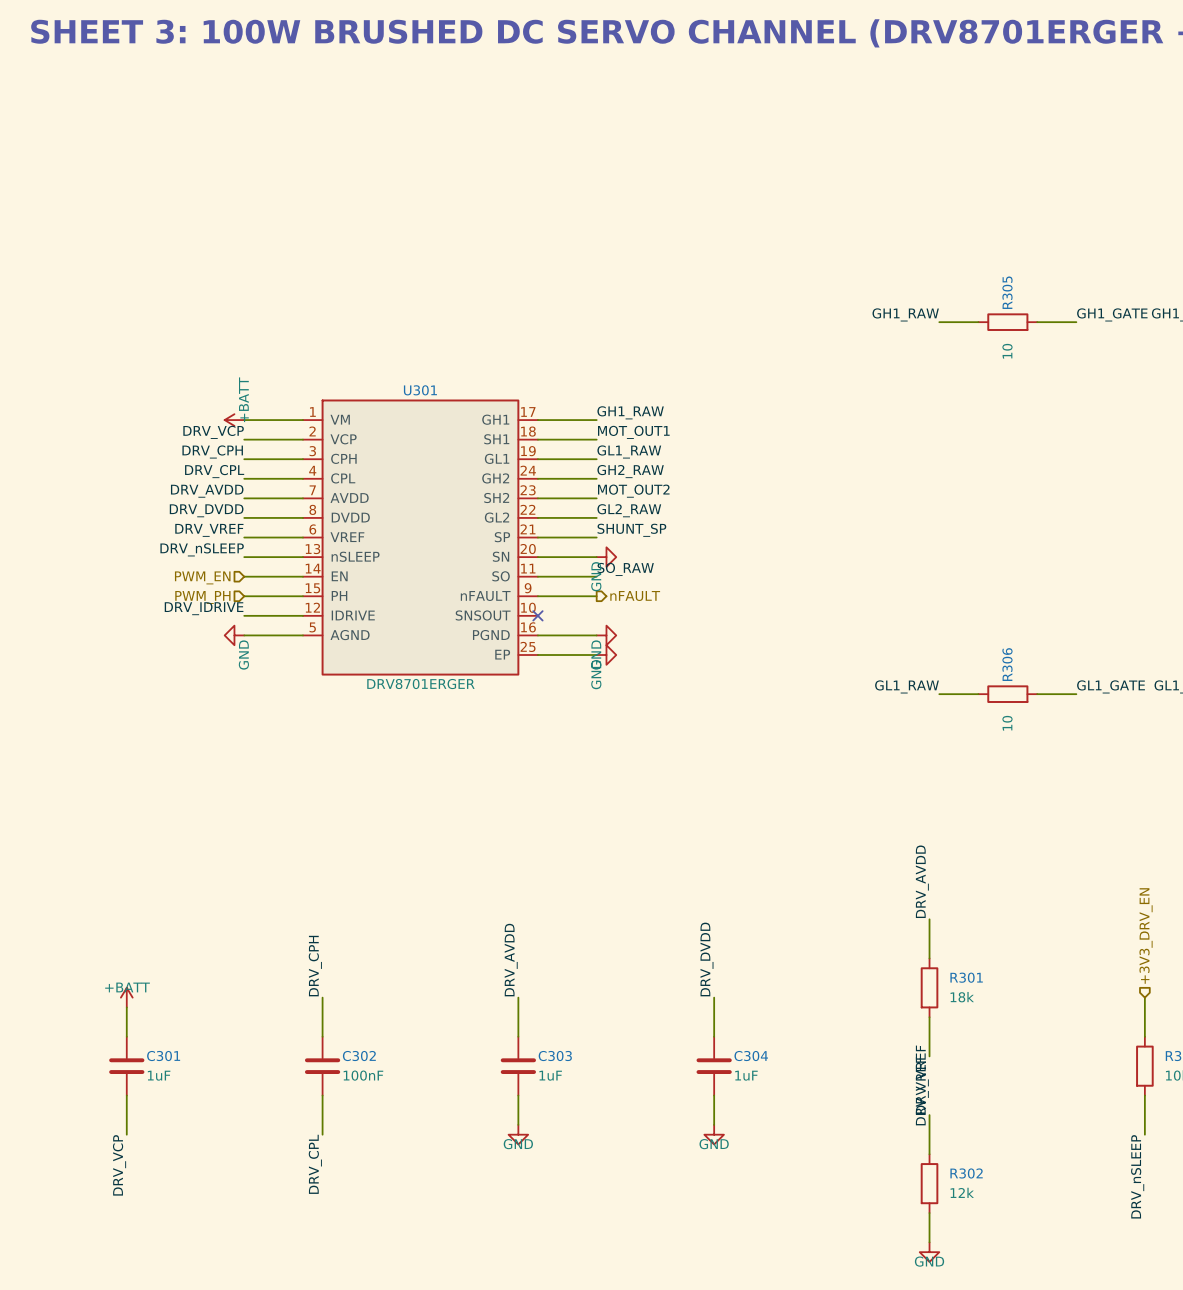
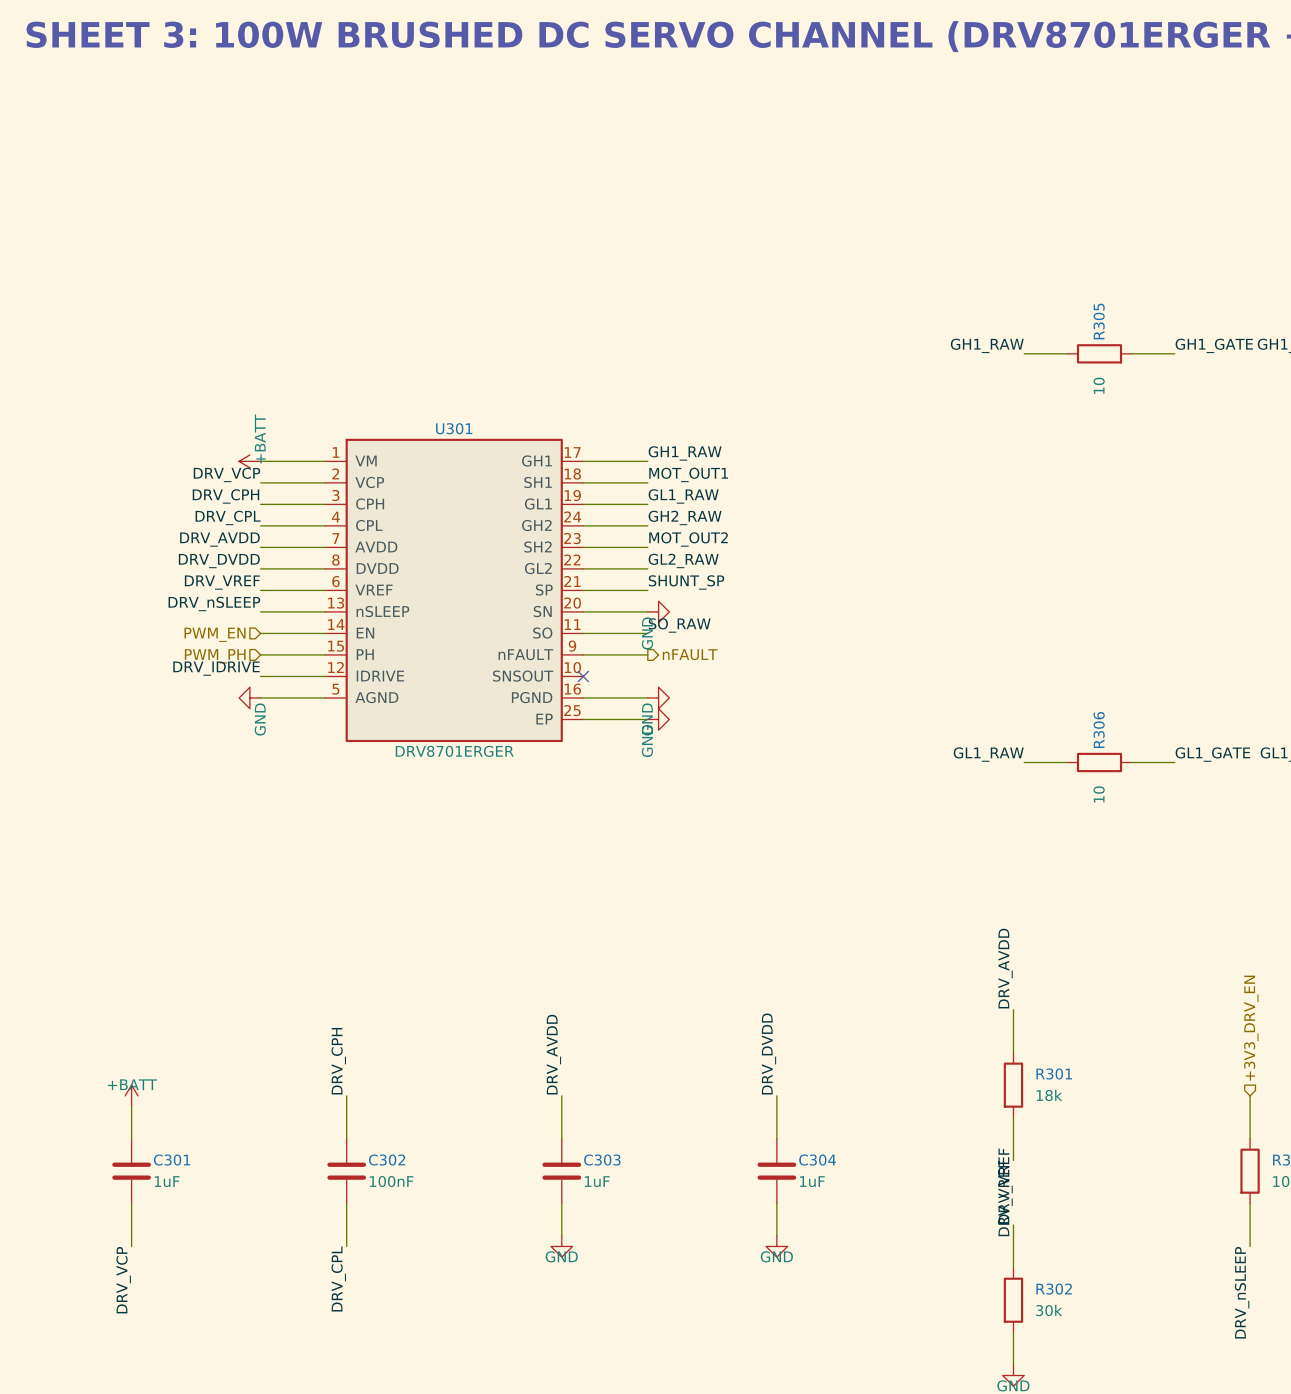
R302 value: 12k (962, 1192) -> 30k (1049, 1310)

